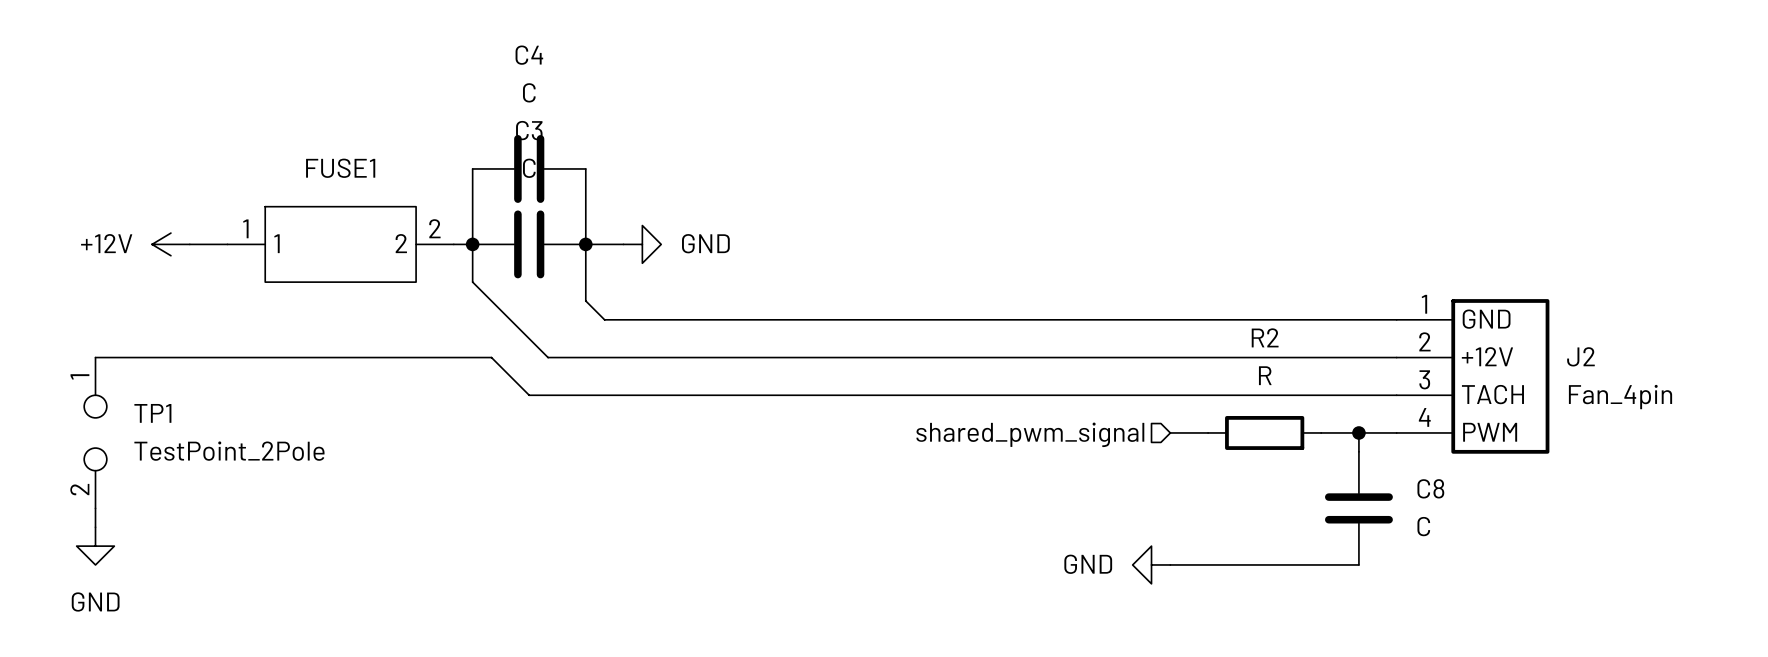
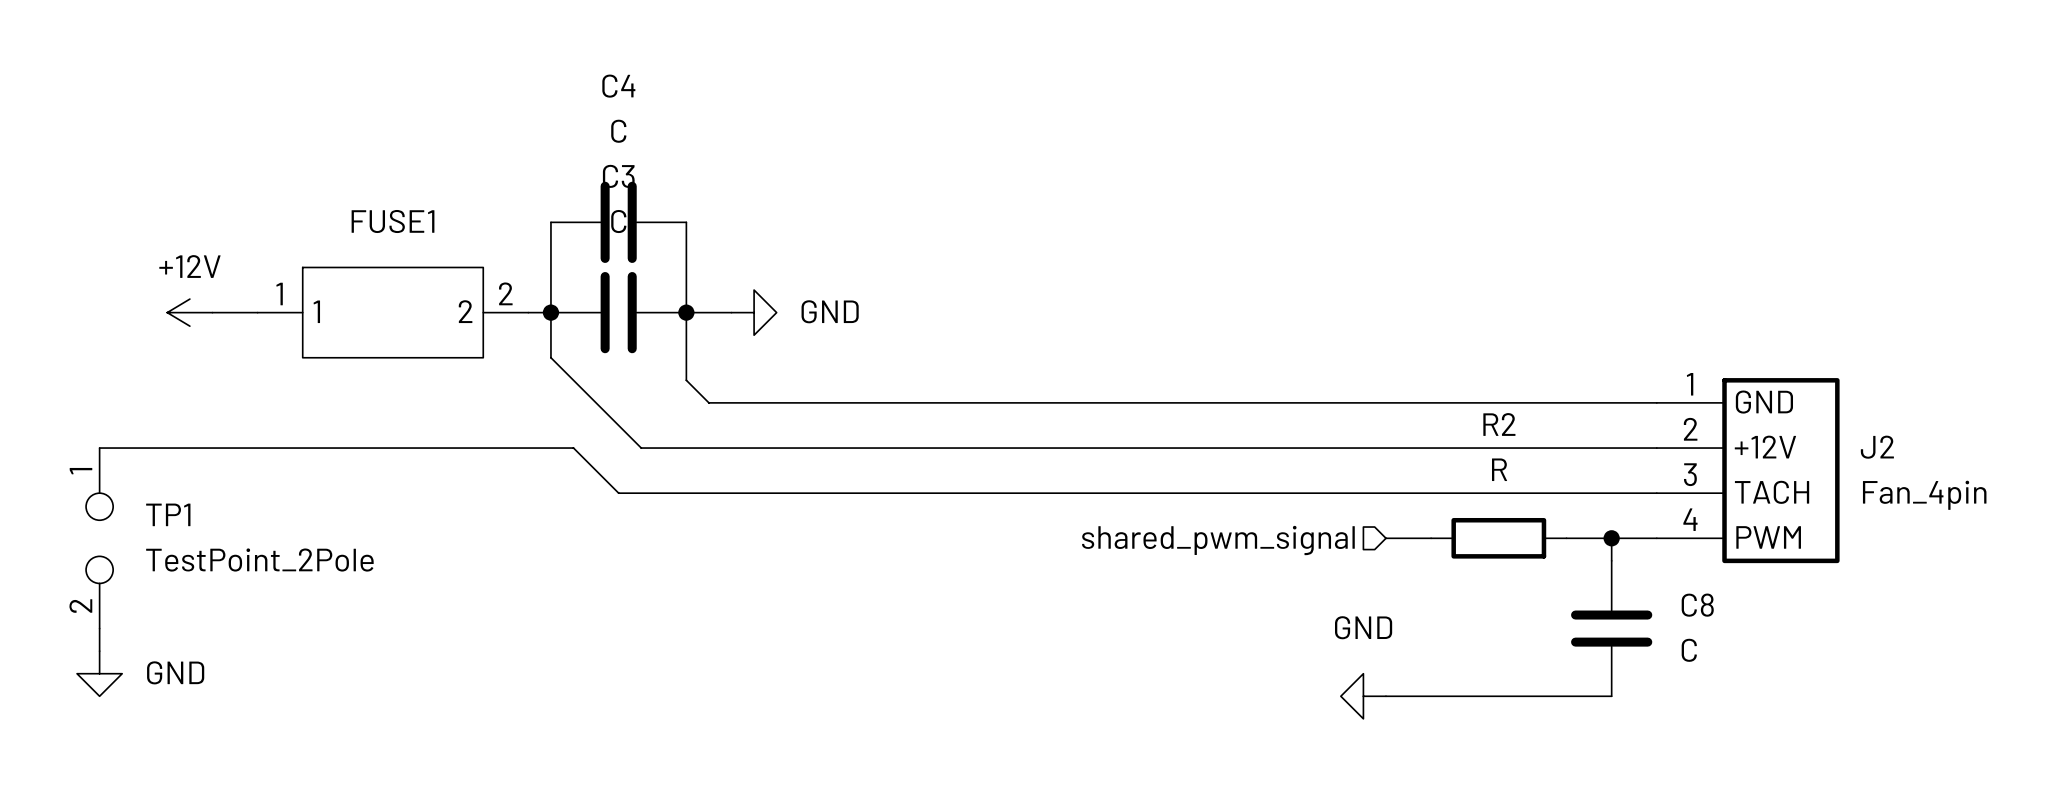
power symbol text position: +12V (106, 243) -> +12V (189, 266)
power symbol text position: GND (1088, 564) -> GND (1363, 627)
power symbol text position: GND (95, 601) -> GND (175, 672)

